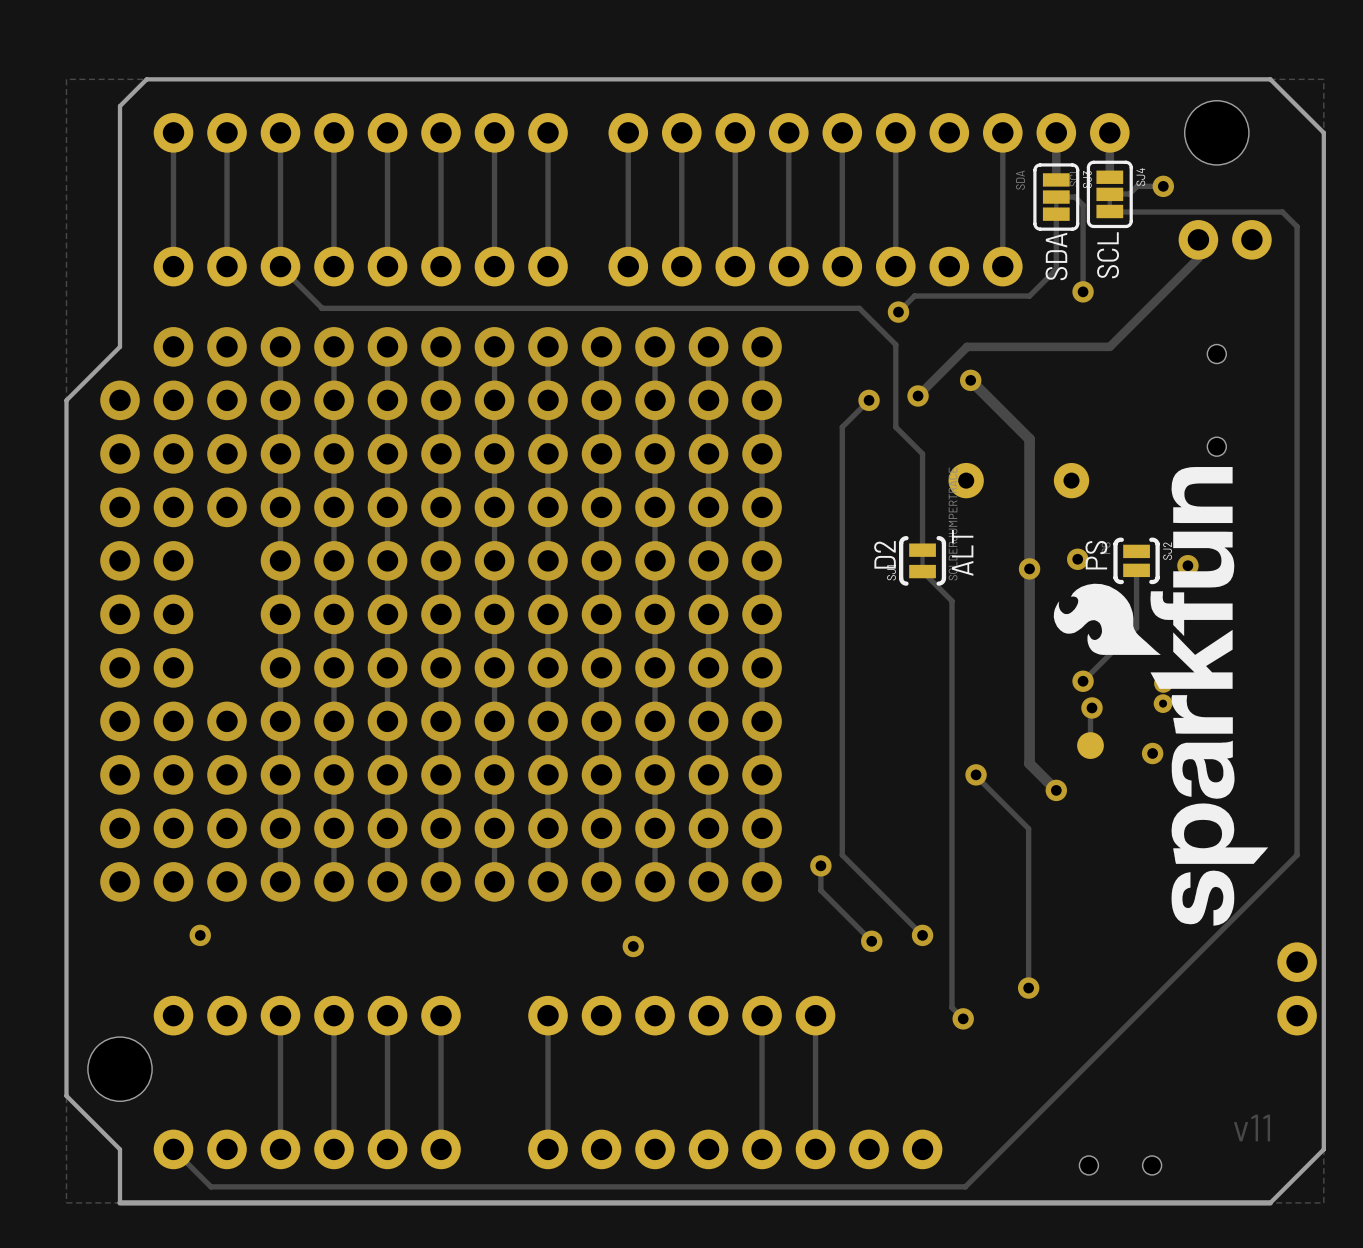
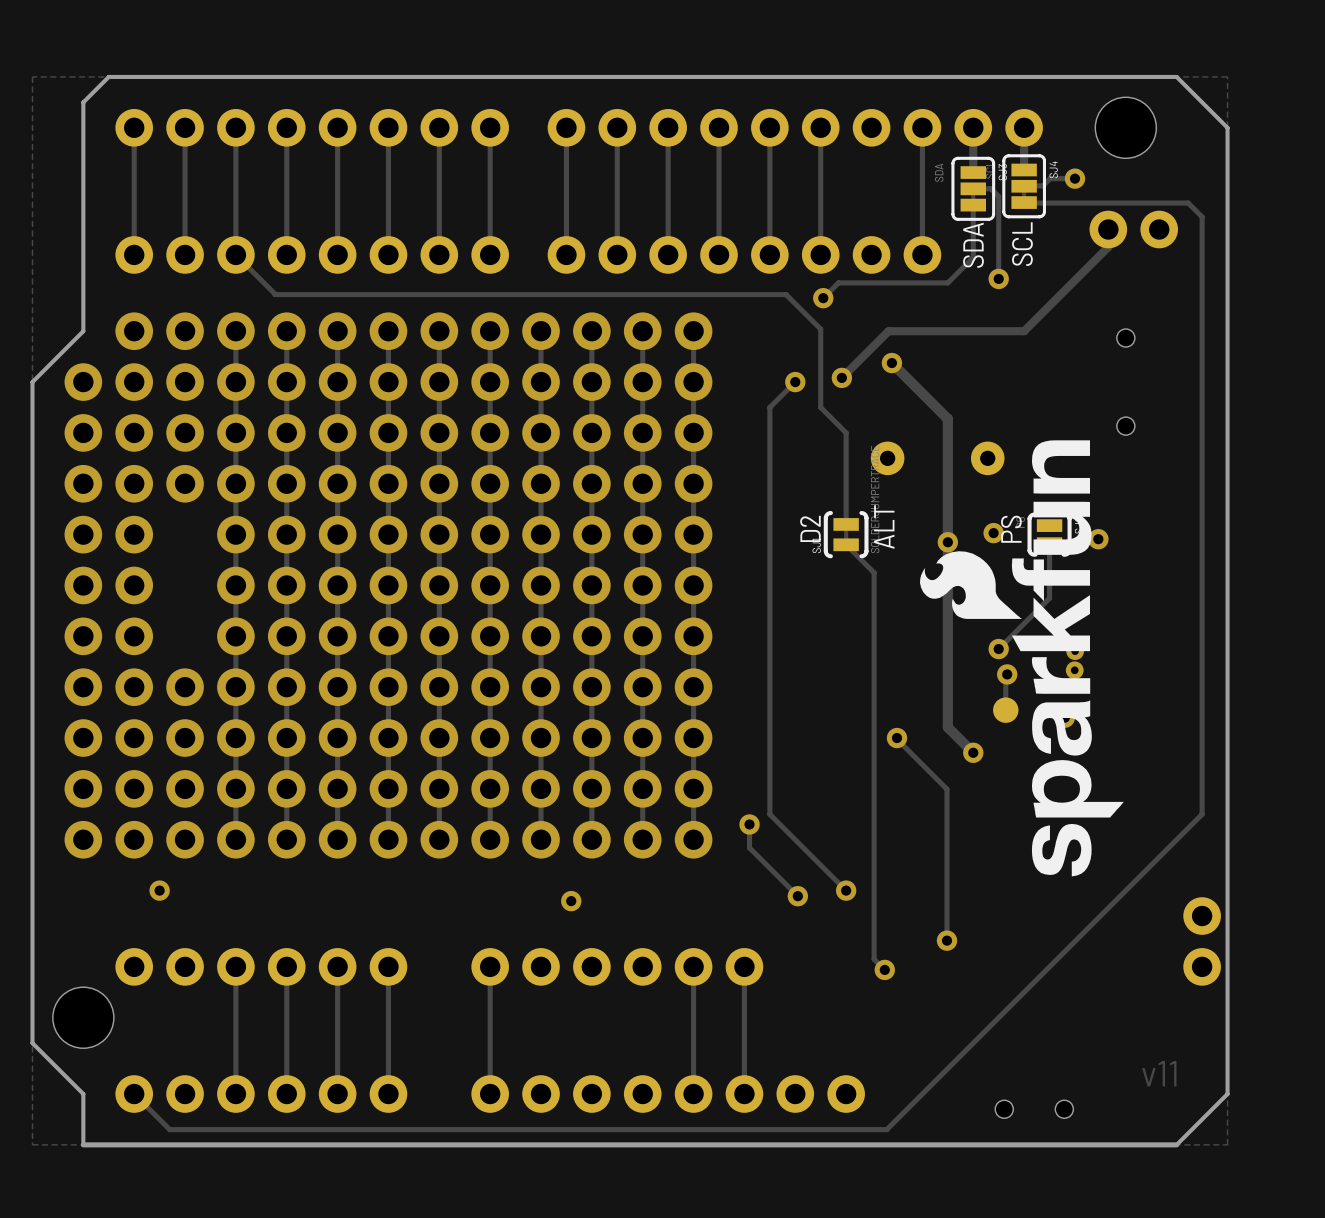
drawing position: (1160, 696) -> (1021, 658)

